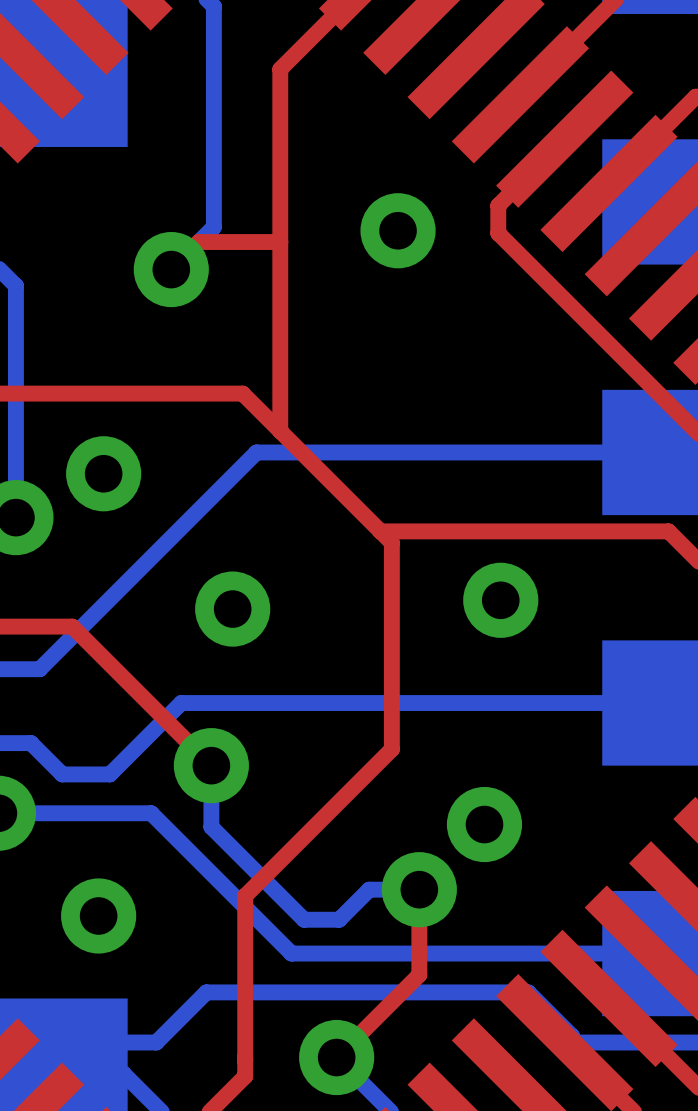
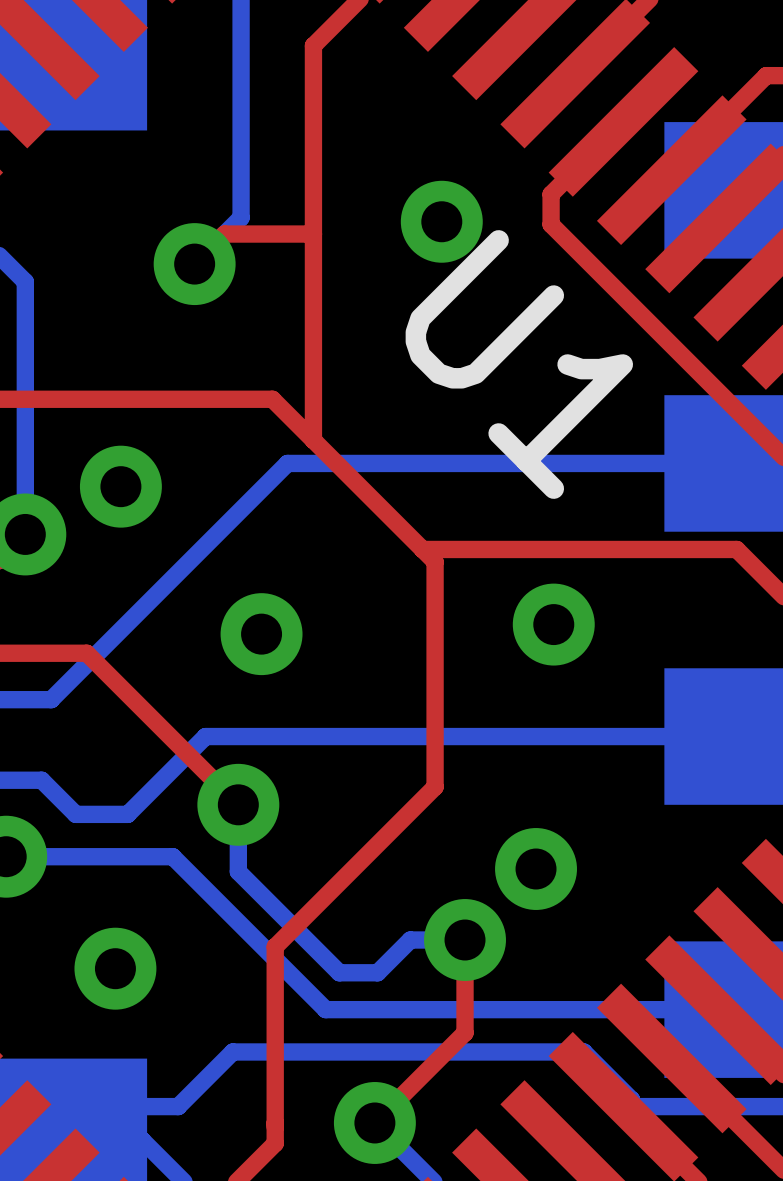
U1 name: none -> U1 (519, 364)

